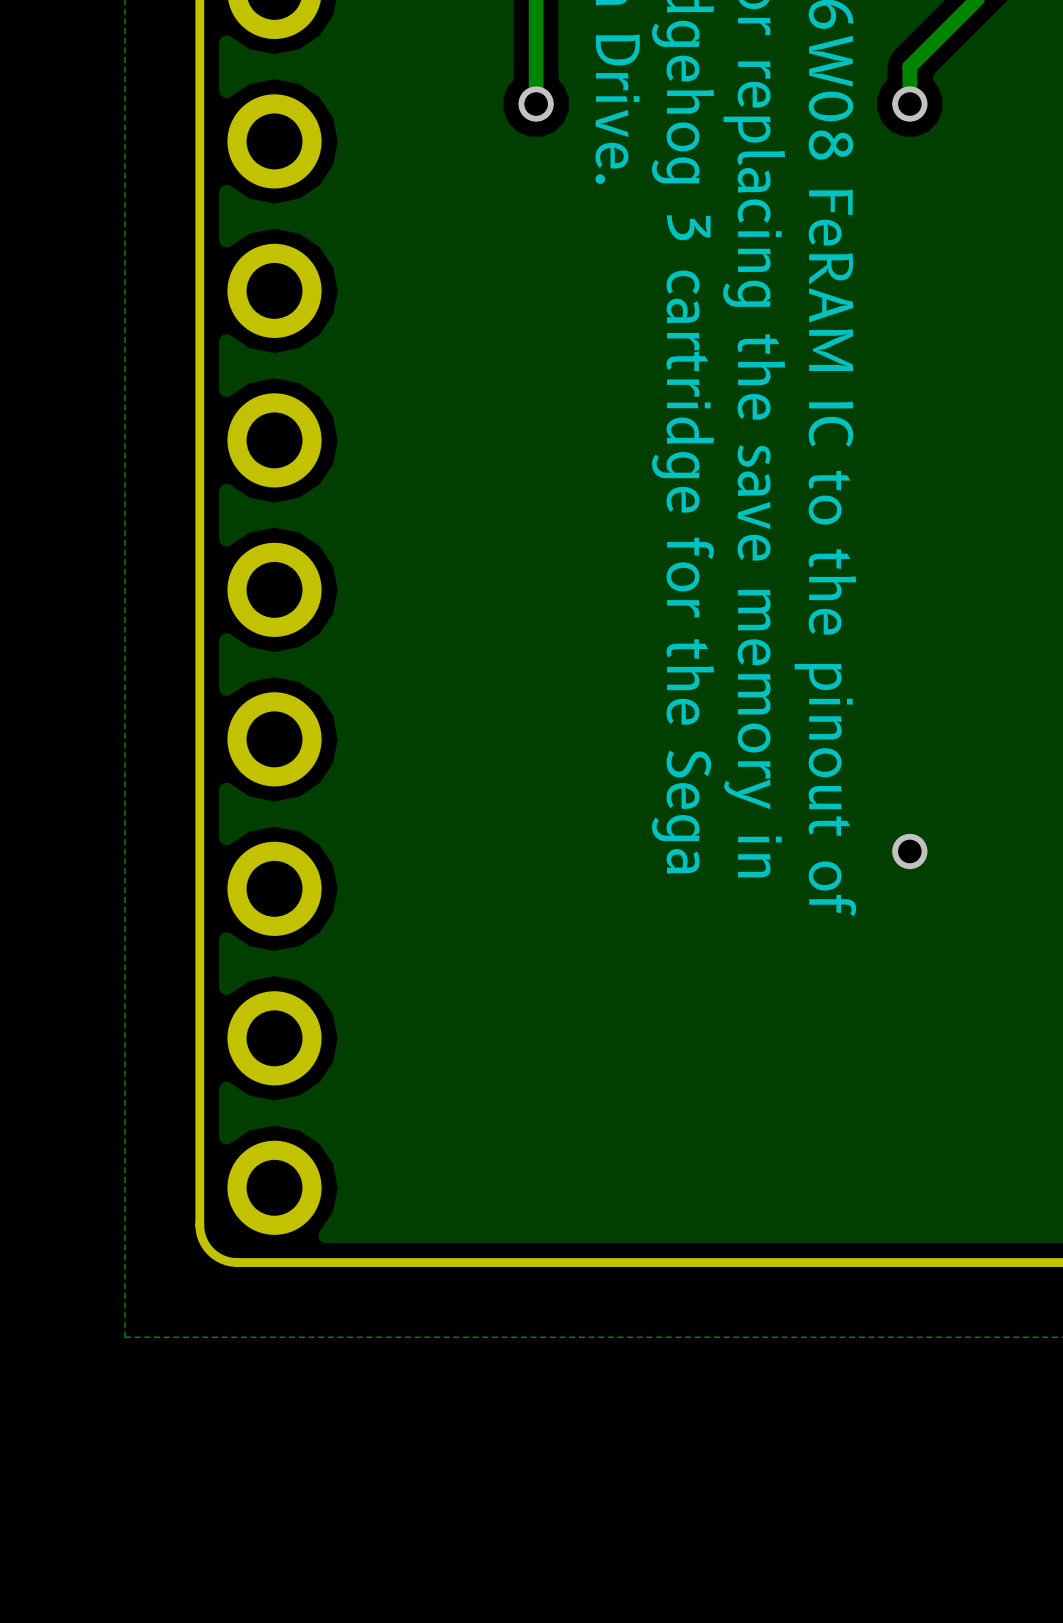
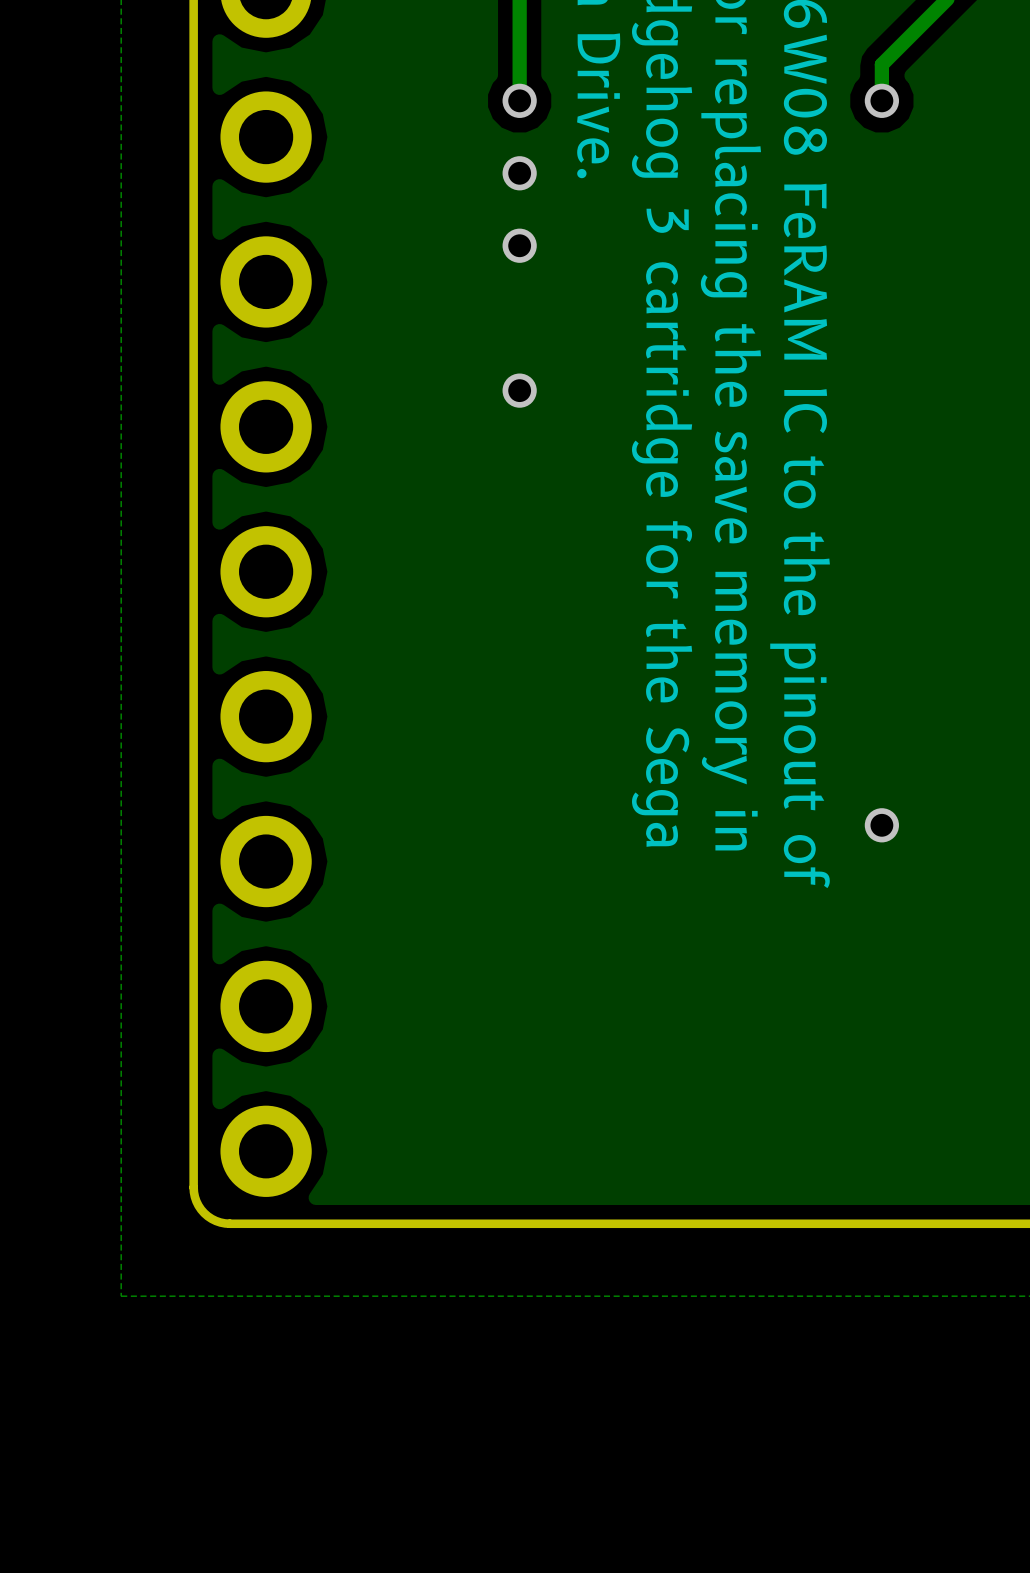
via: none -> (519, 173)
via: none -> (519, 245)
via: none -> (519, 390)

